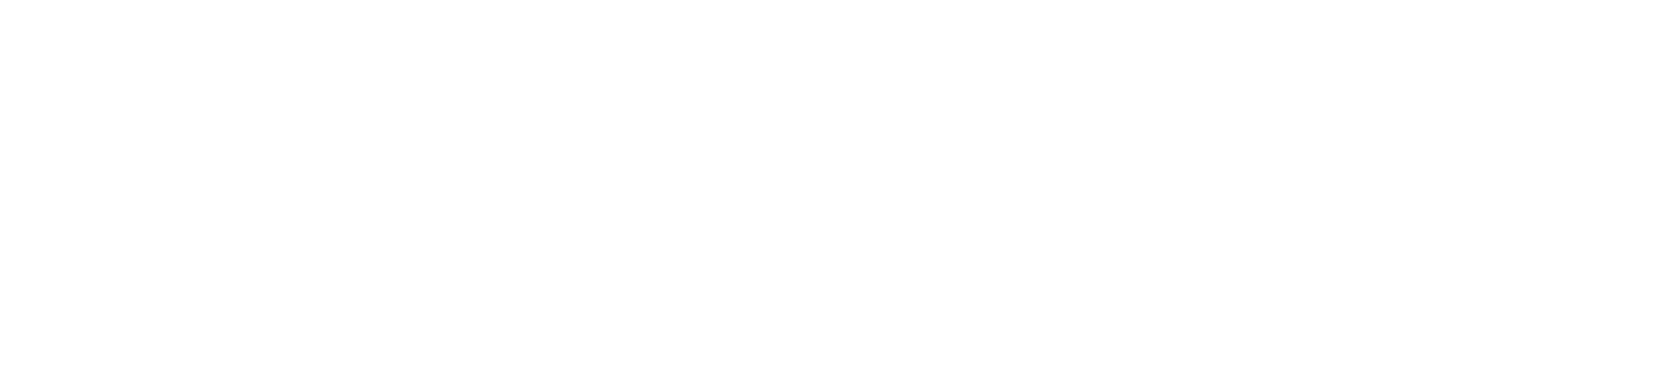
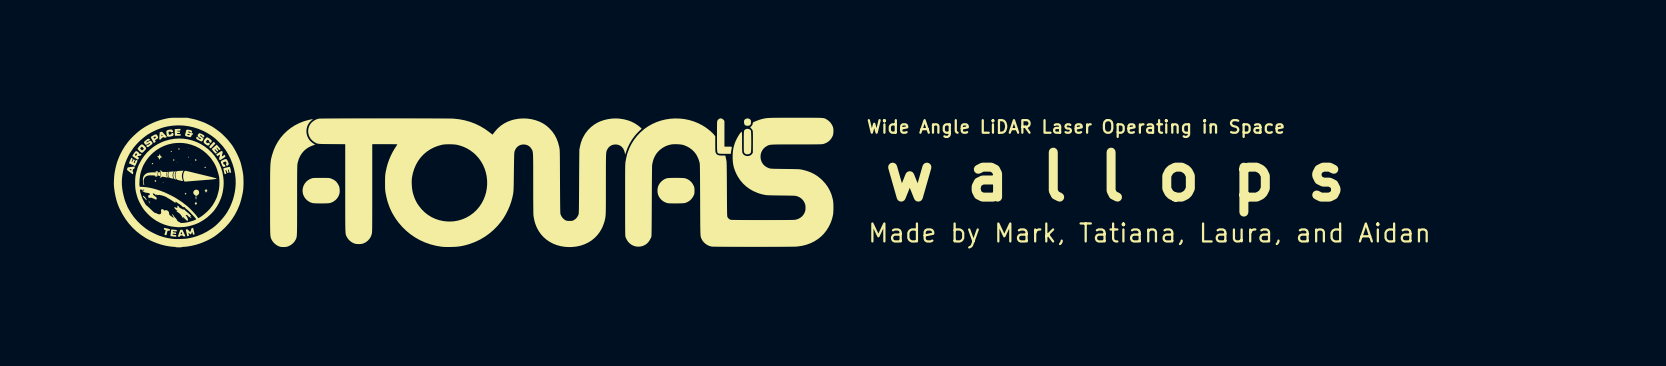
drawing: none -> [113, 117, 834, 248]
text: none -> Wide Angle LiDAR Laser Operating in Space (1075, 128)
text: none -> w a l l o p s (1114, 182)
text: none -> Made by Mark, Tatiana, Laura, and Aidan (1149, 235)

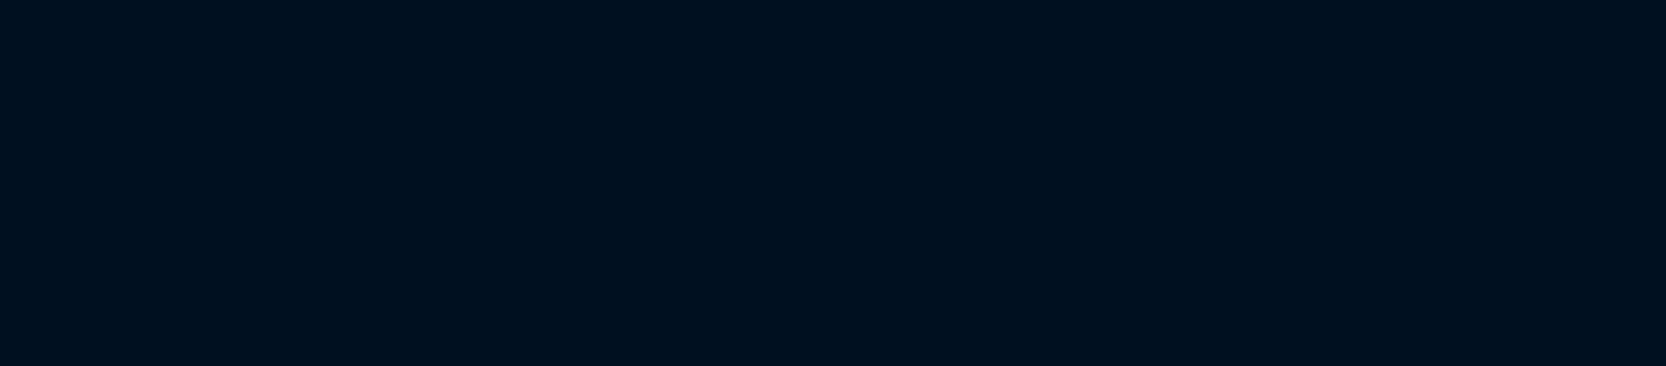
drawing: [113, 117, 834, 248] -> none
text: Wide Angle LiDAR Laser Operating in Space (1075, 128) -> none
text: w a l l o p s (1114, 182) -> none
text: Made by Mark, Tatiana, Laura, and Aidan (1149, 235) -> none

